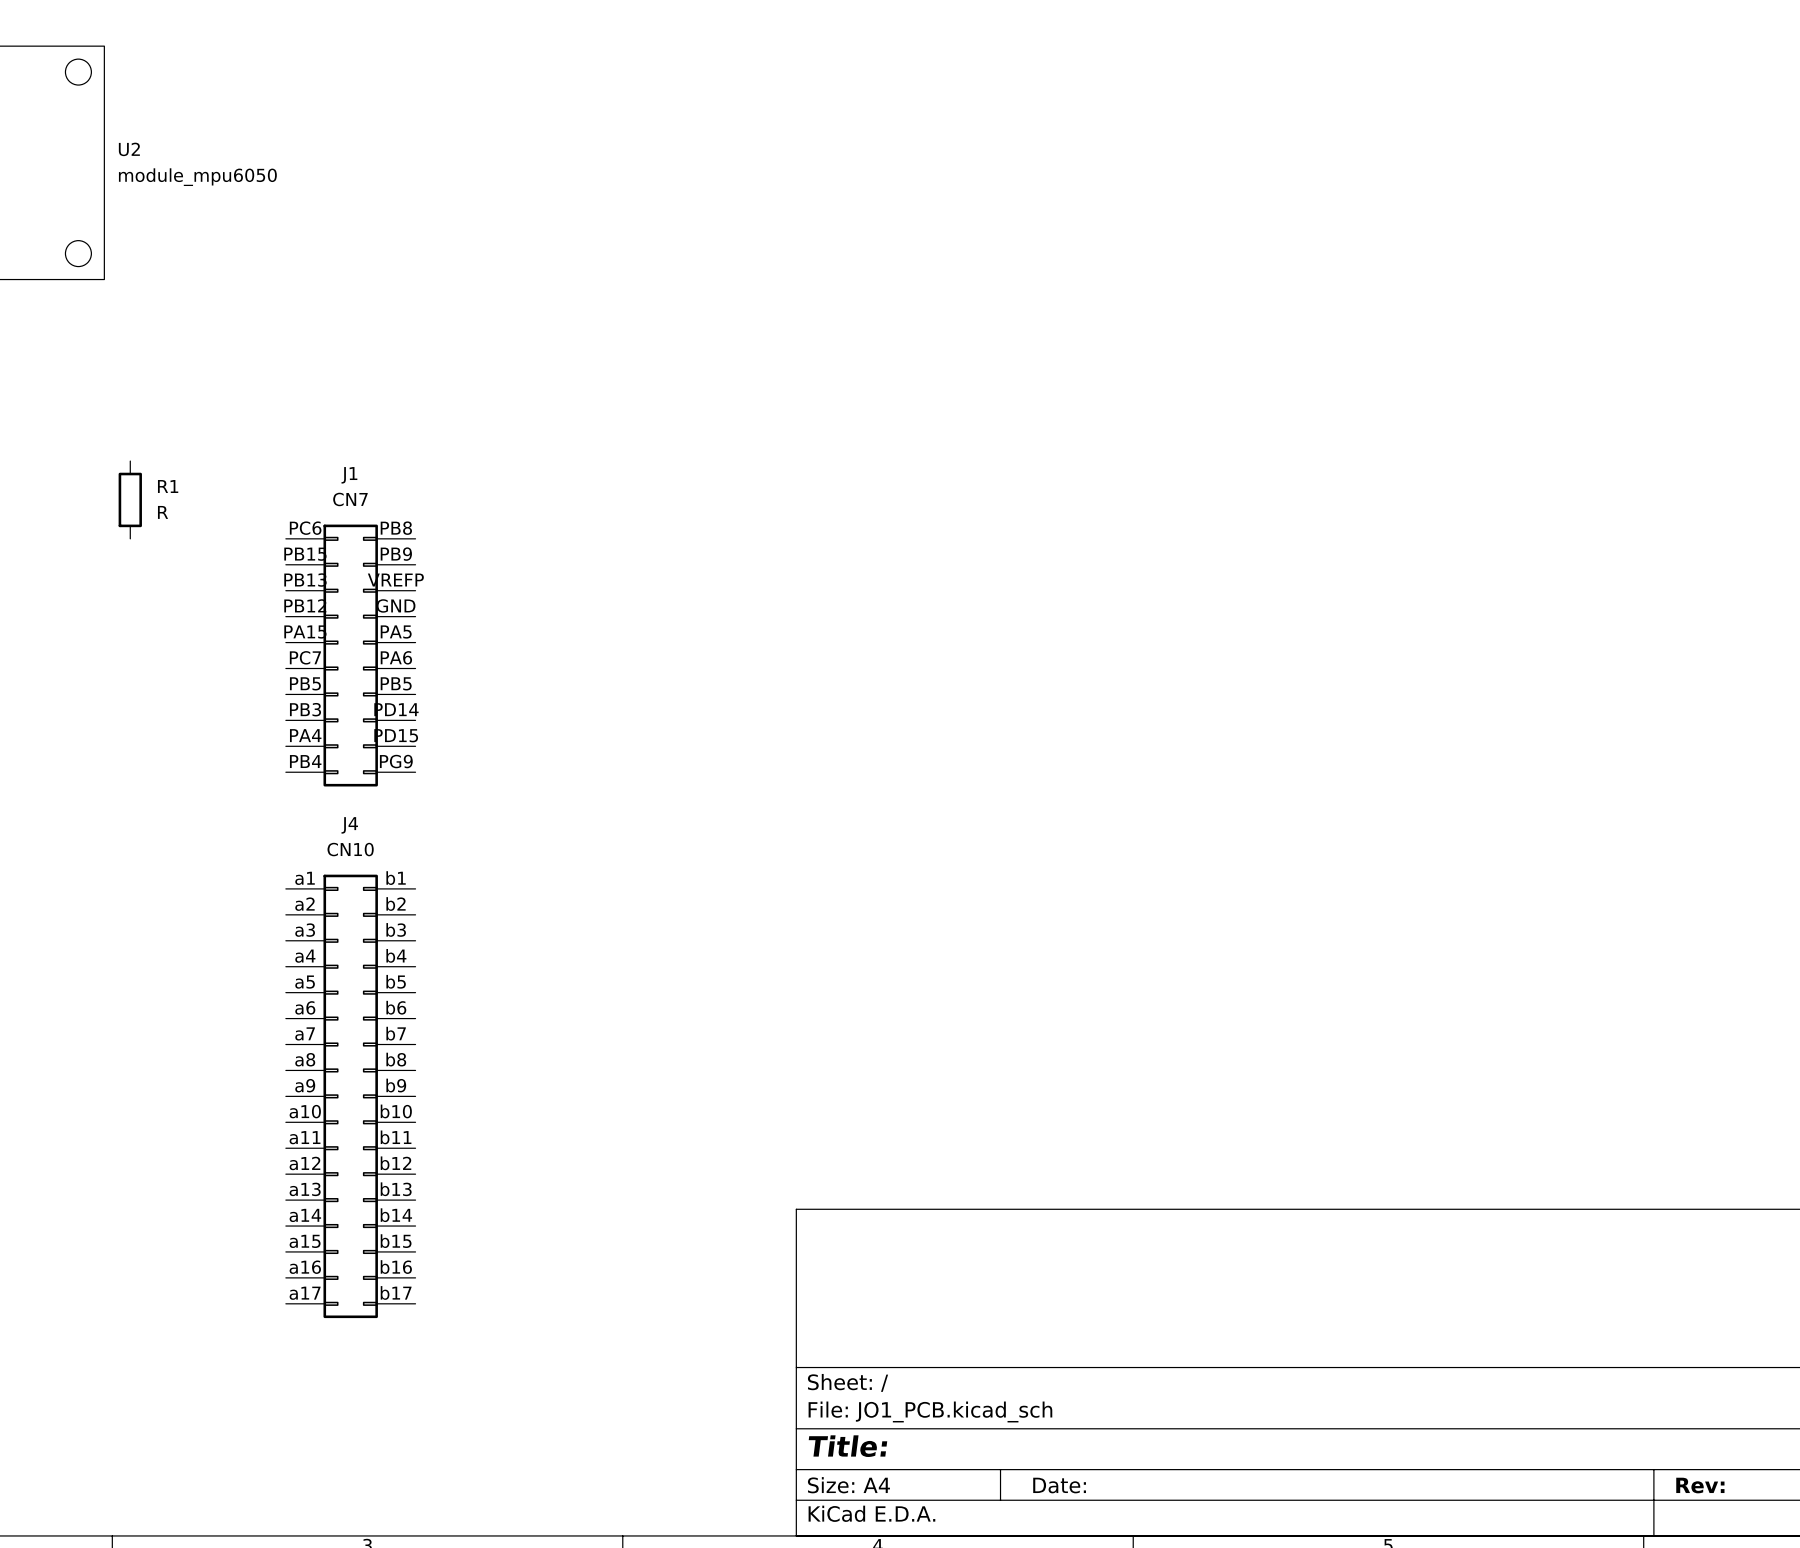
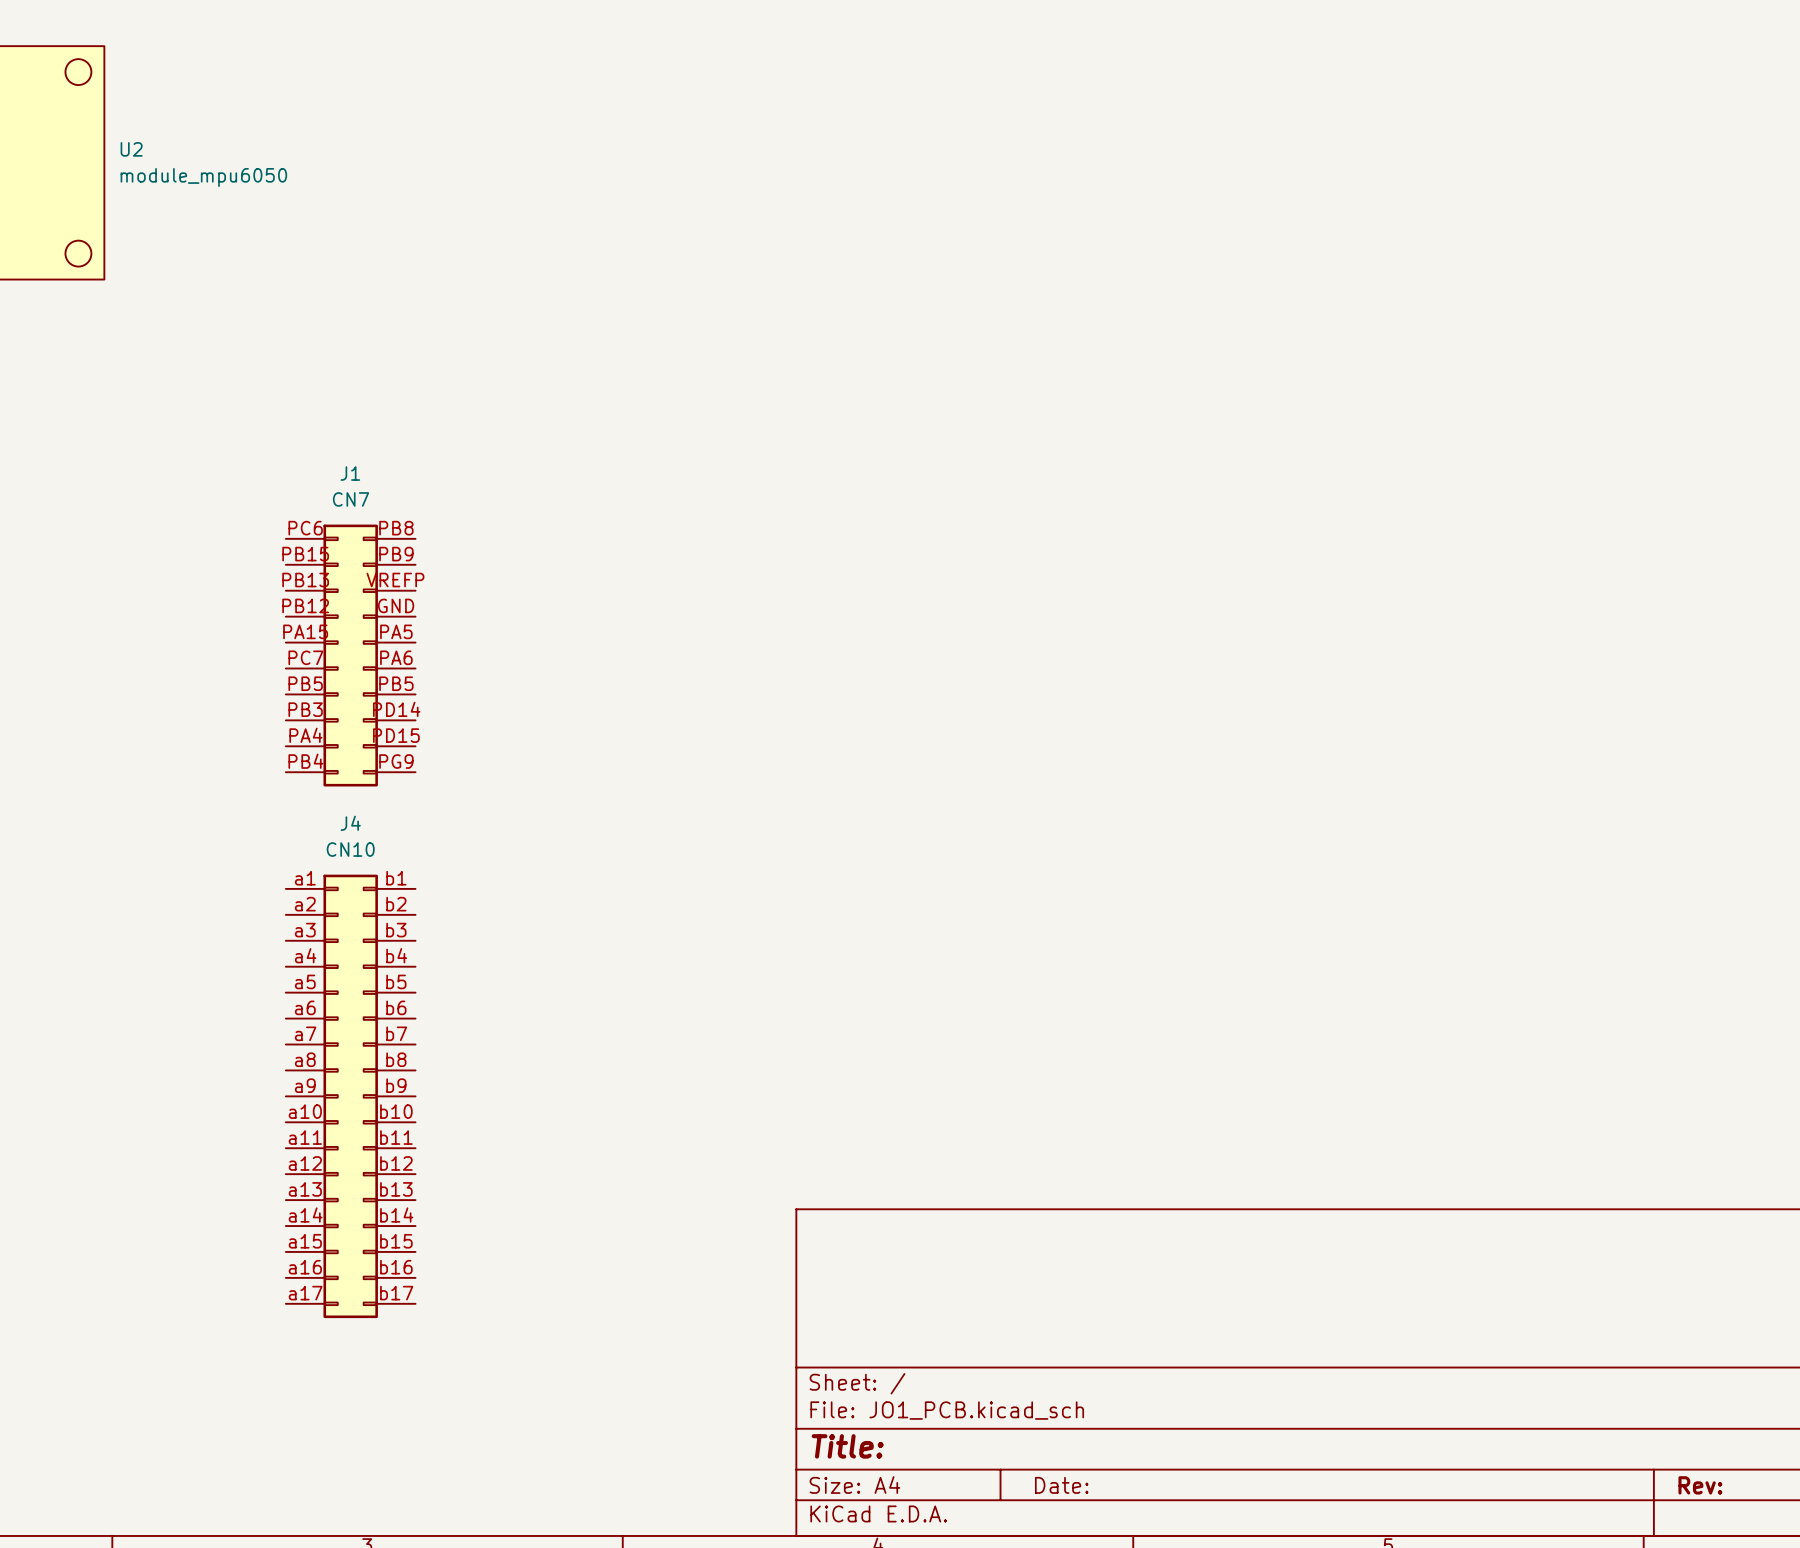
R1: R (130, 499) -> none

